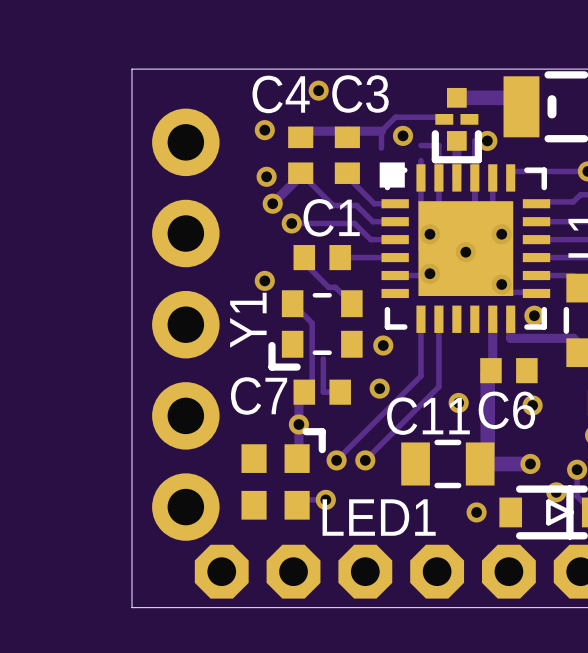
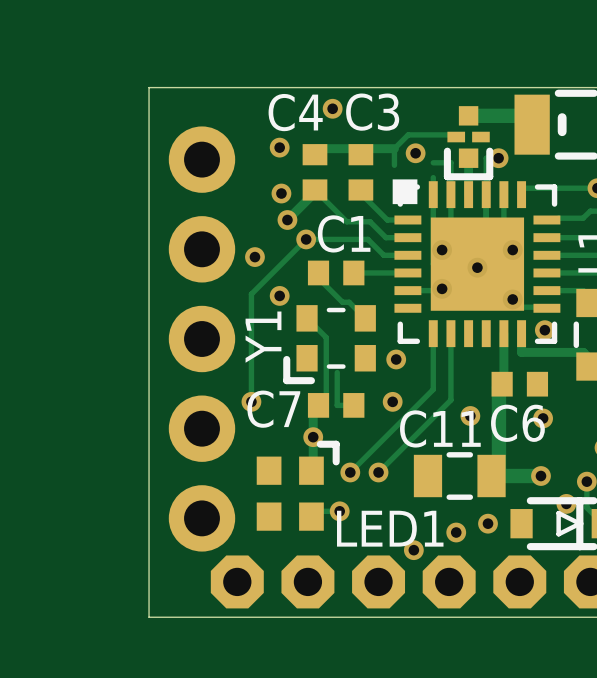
track: none -> (306, 239) (251, 294) (251, 401)
via: none -> (254, 257)
via: none -> (251, 401)
via: none -> (456, 532)
via: none -> (413, 550)

